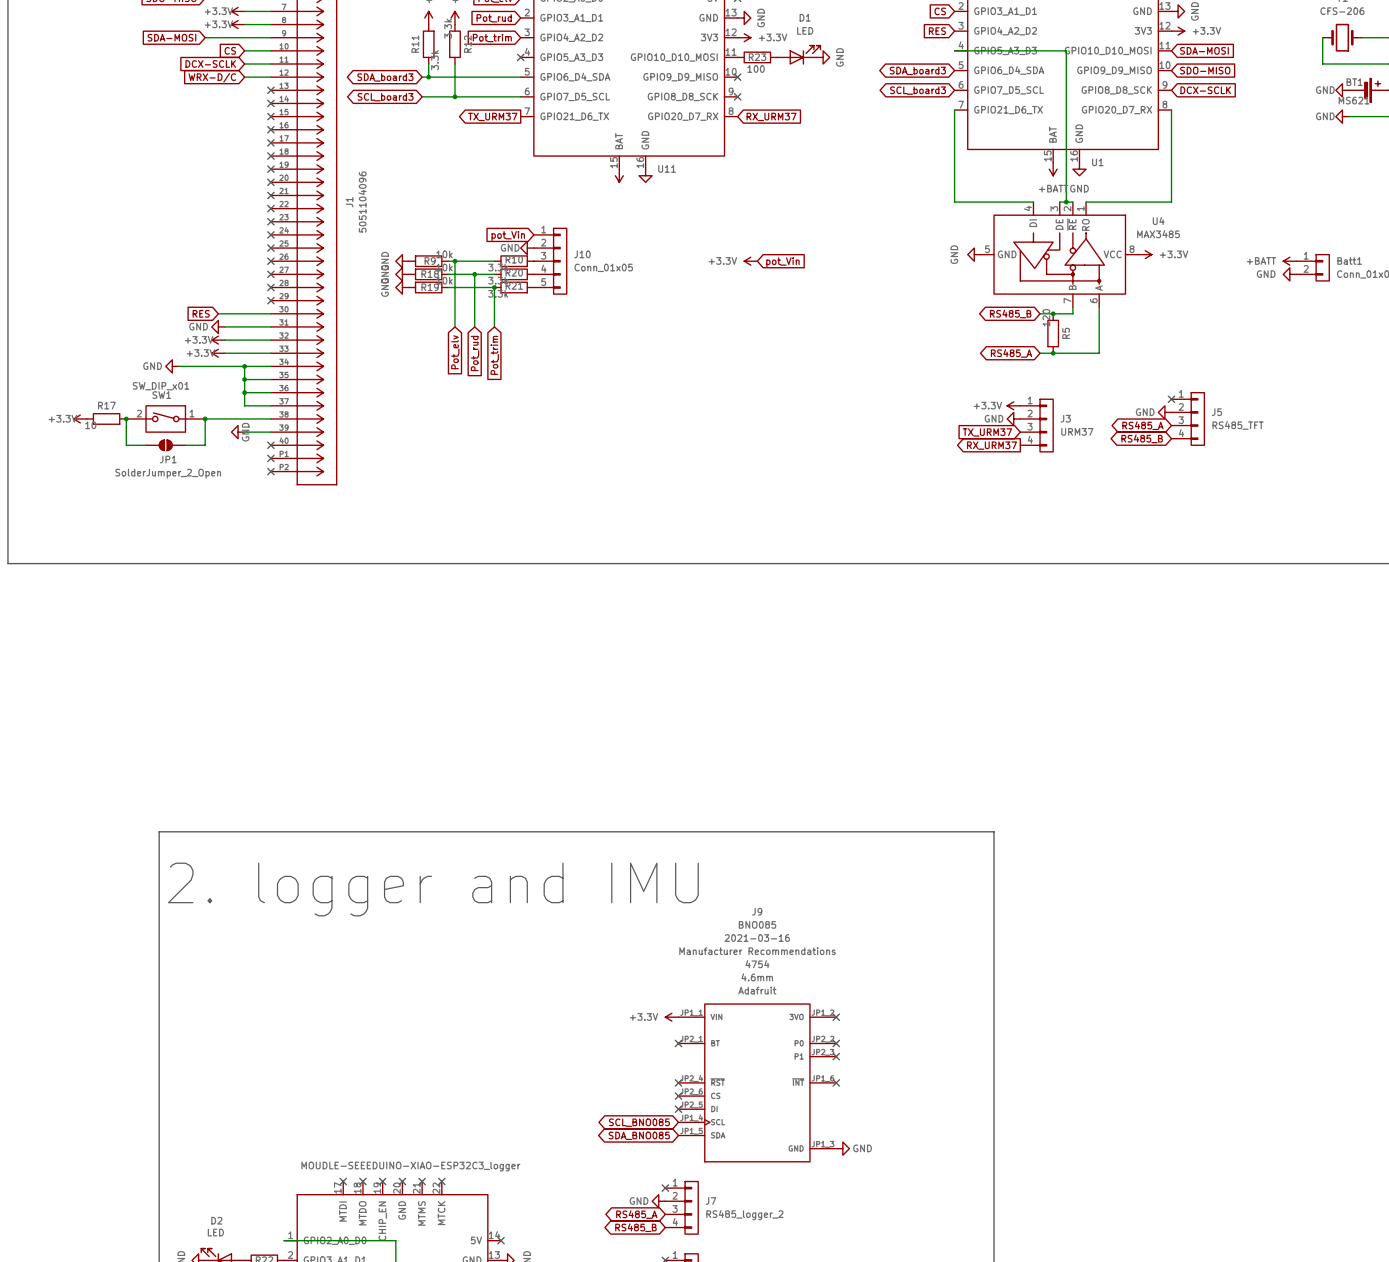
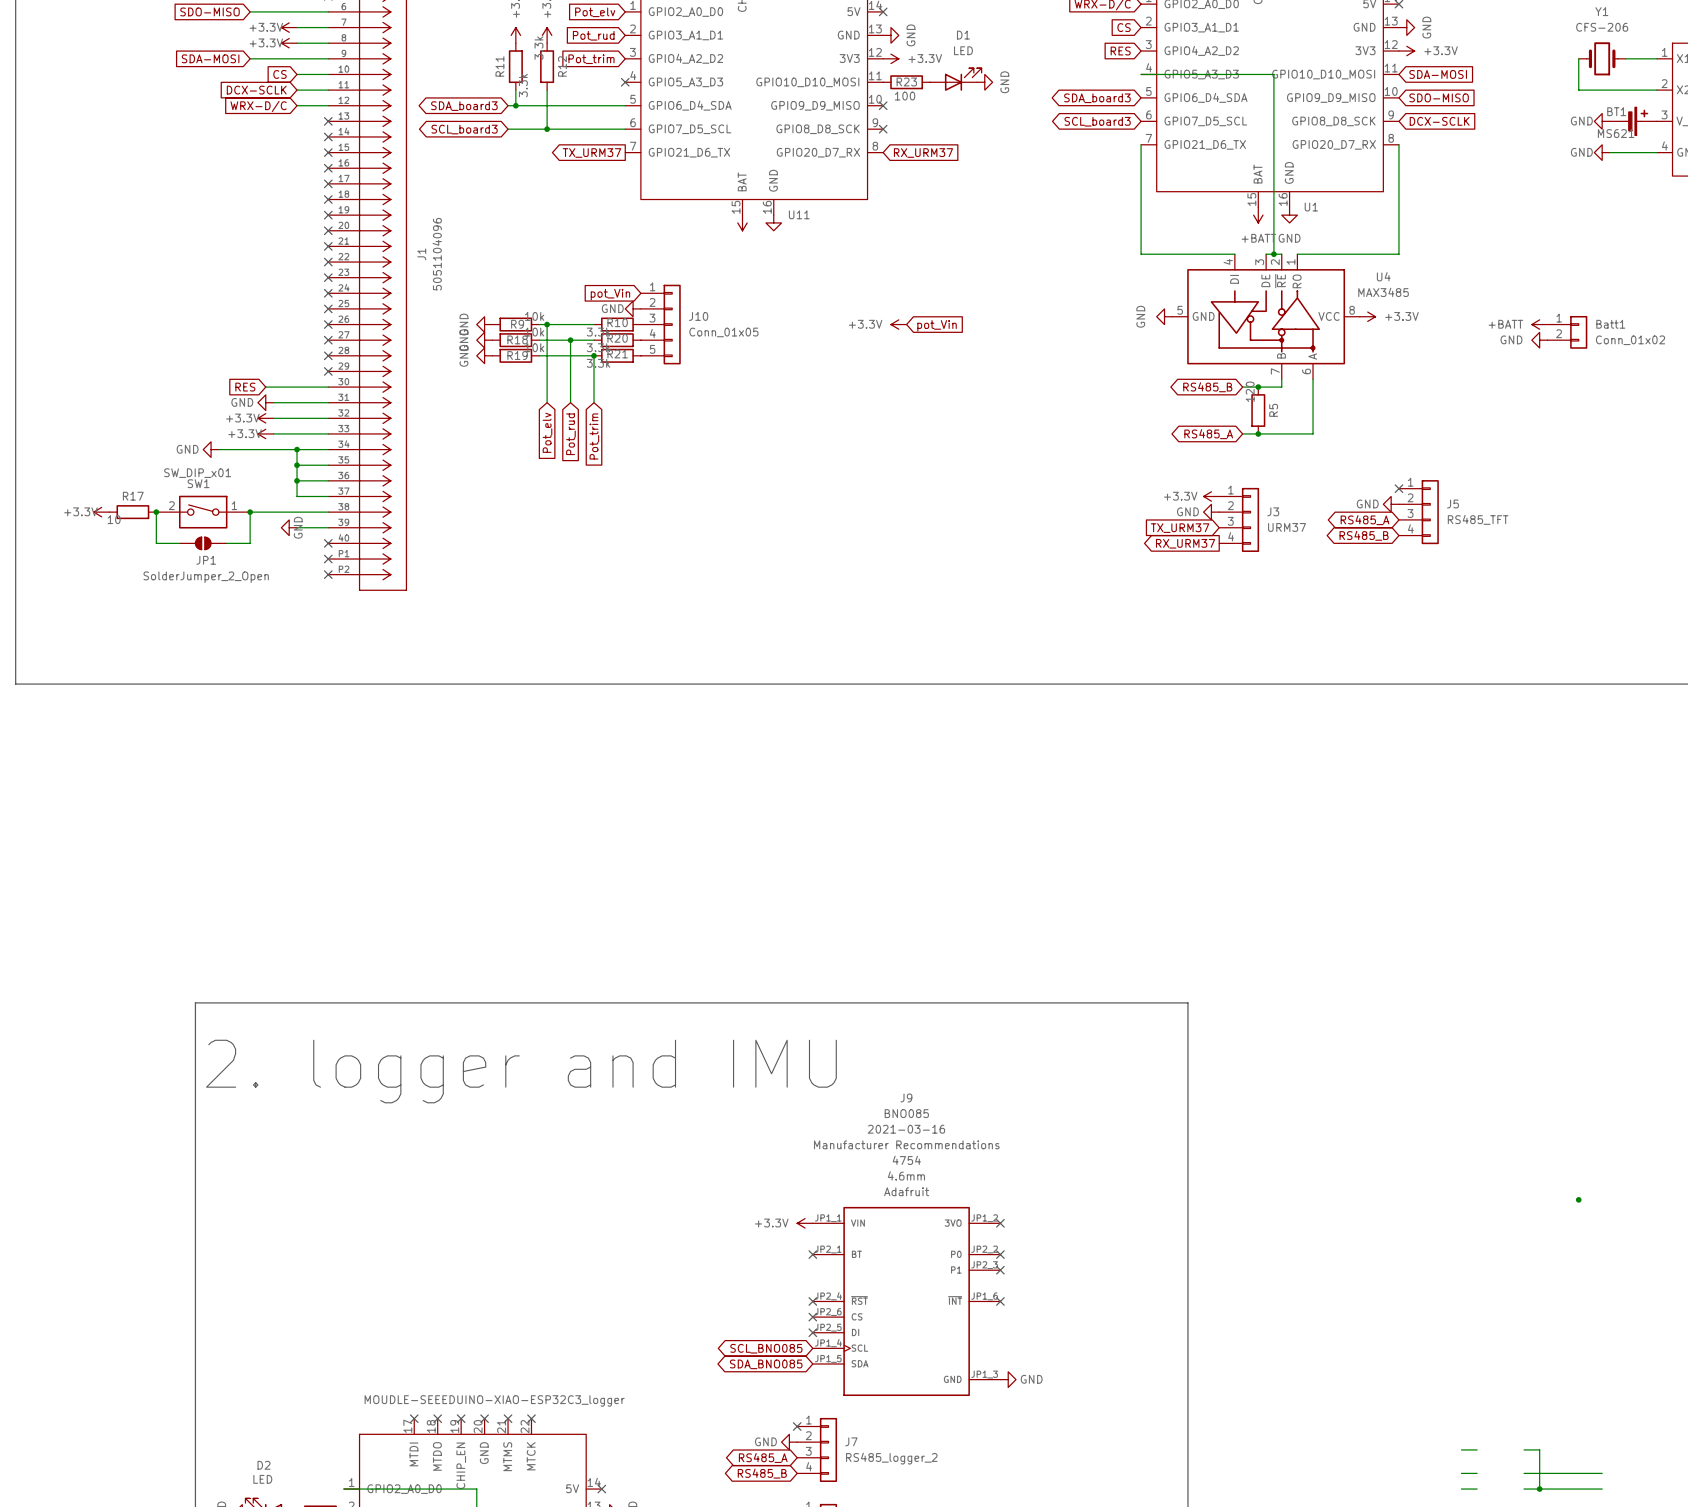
junction: none -> (1578, 1199)
wire: none -> (1461, 1449) (1477, 1449)
wire: none -> (1524, 1449) (1539, 1449) (1539, 1489)
wire: none -> (1461, 1473) (1477, 1473)
wire: none -> (1524, 1473) (1602, 1473)
wire: none -> (1461, 1489) (1477, 1489)
wire: none -> (1524, 1489) (1602, 1489)
junction: none -> (1539, 1489)

